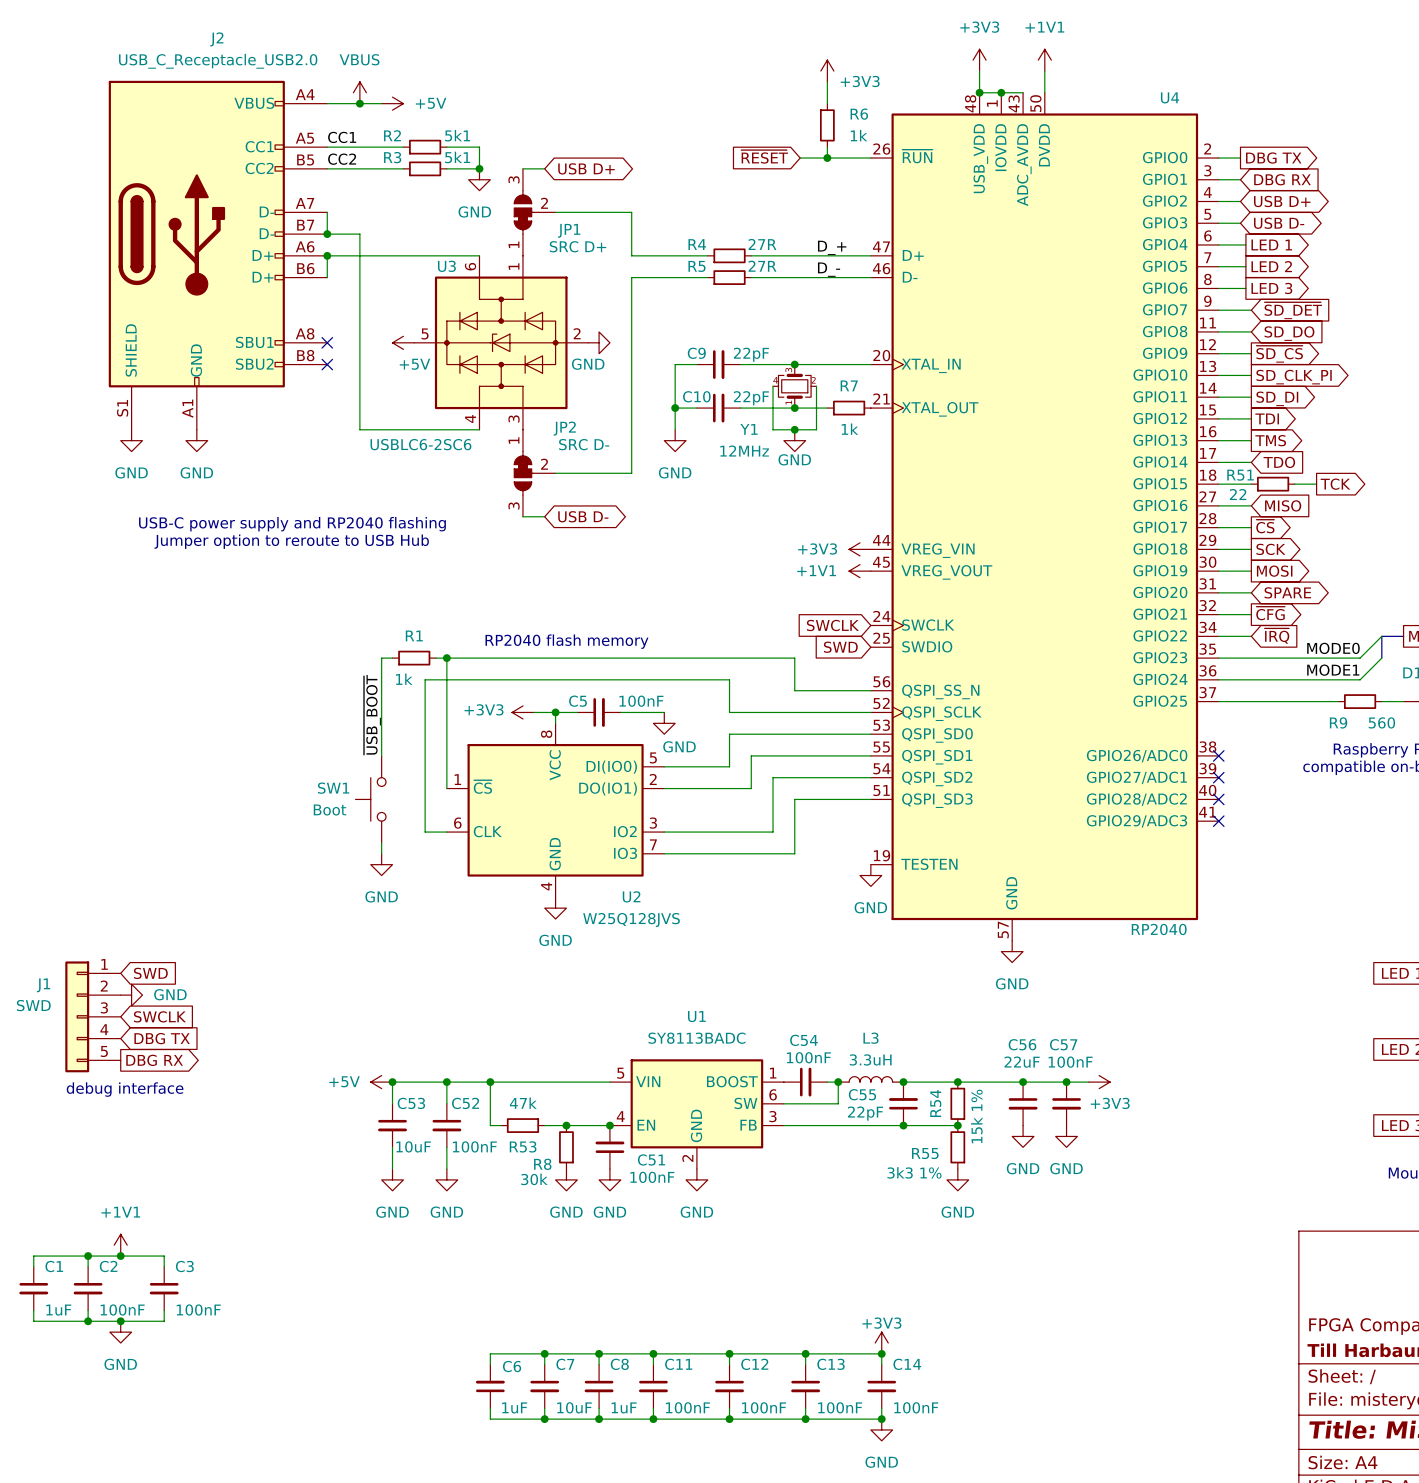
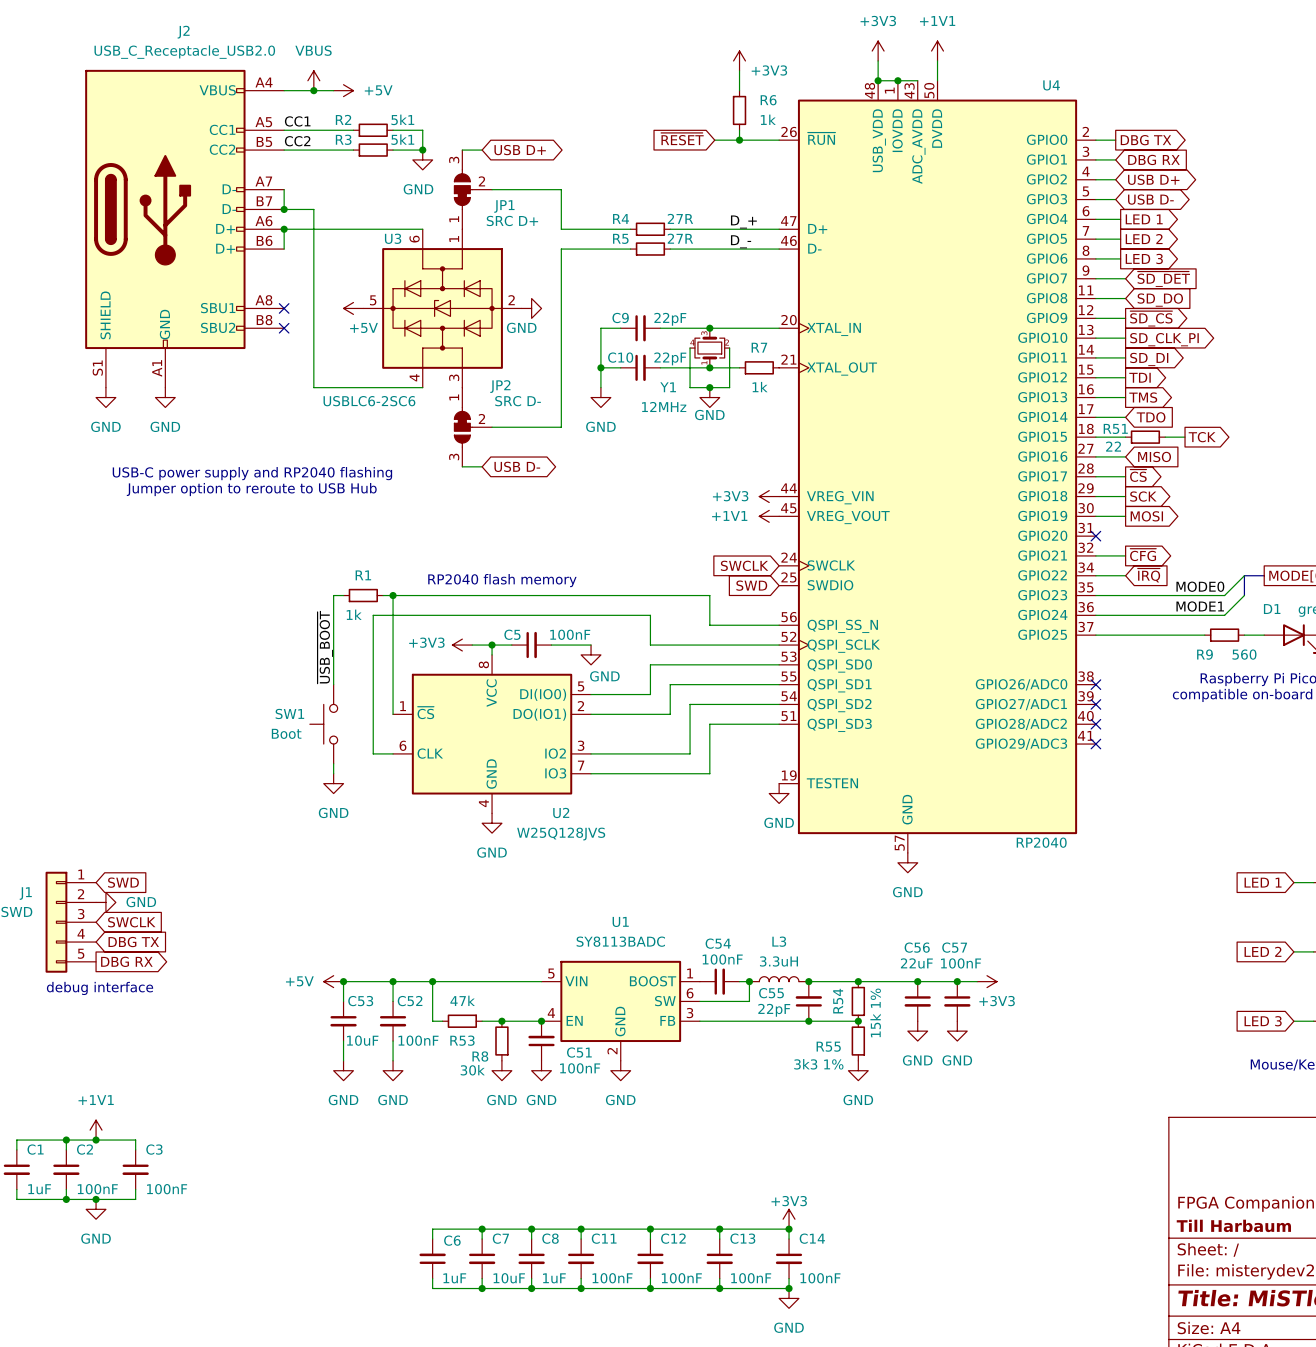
wire: (1218, 592) (1251, 592) -> none
no-connect mark: none -> (1095, 536)
global label: SPARE (1287, 592) -> none

